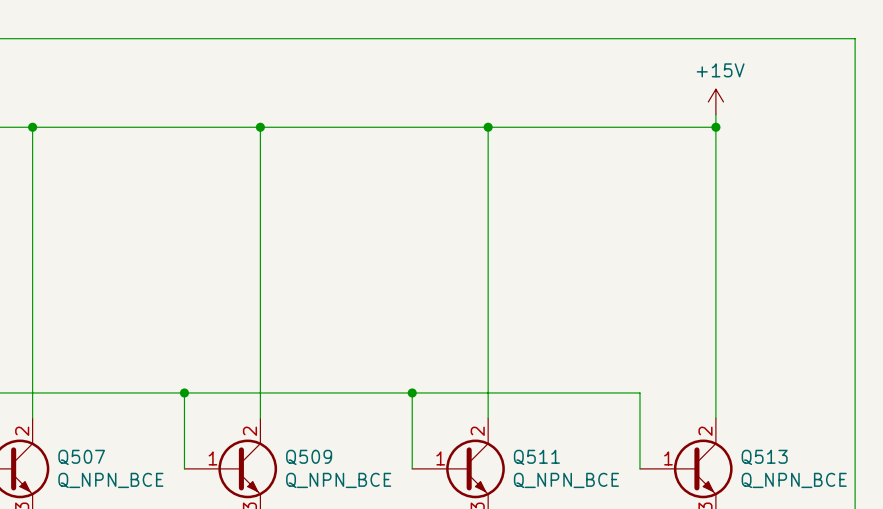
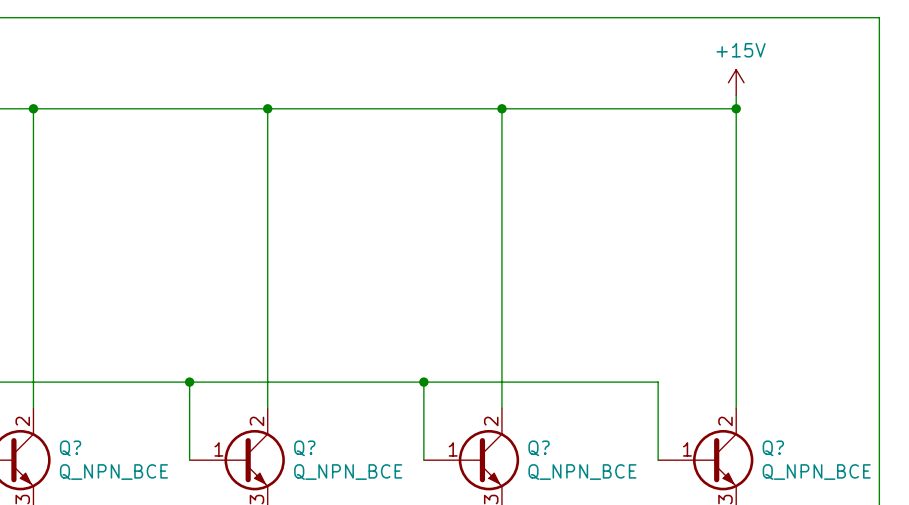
Q507 name: Q507 (81, 457) -> Q? (70, 448)
Q509 name: Q509 (309, 457) -> Q? (304, 448)
Q511 name: Q511 (536, 457) -> Q? (539, 448)
Q513 name: Q513 (764, 457) -> Q? (773, 448)

